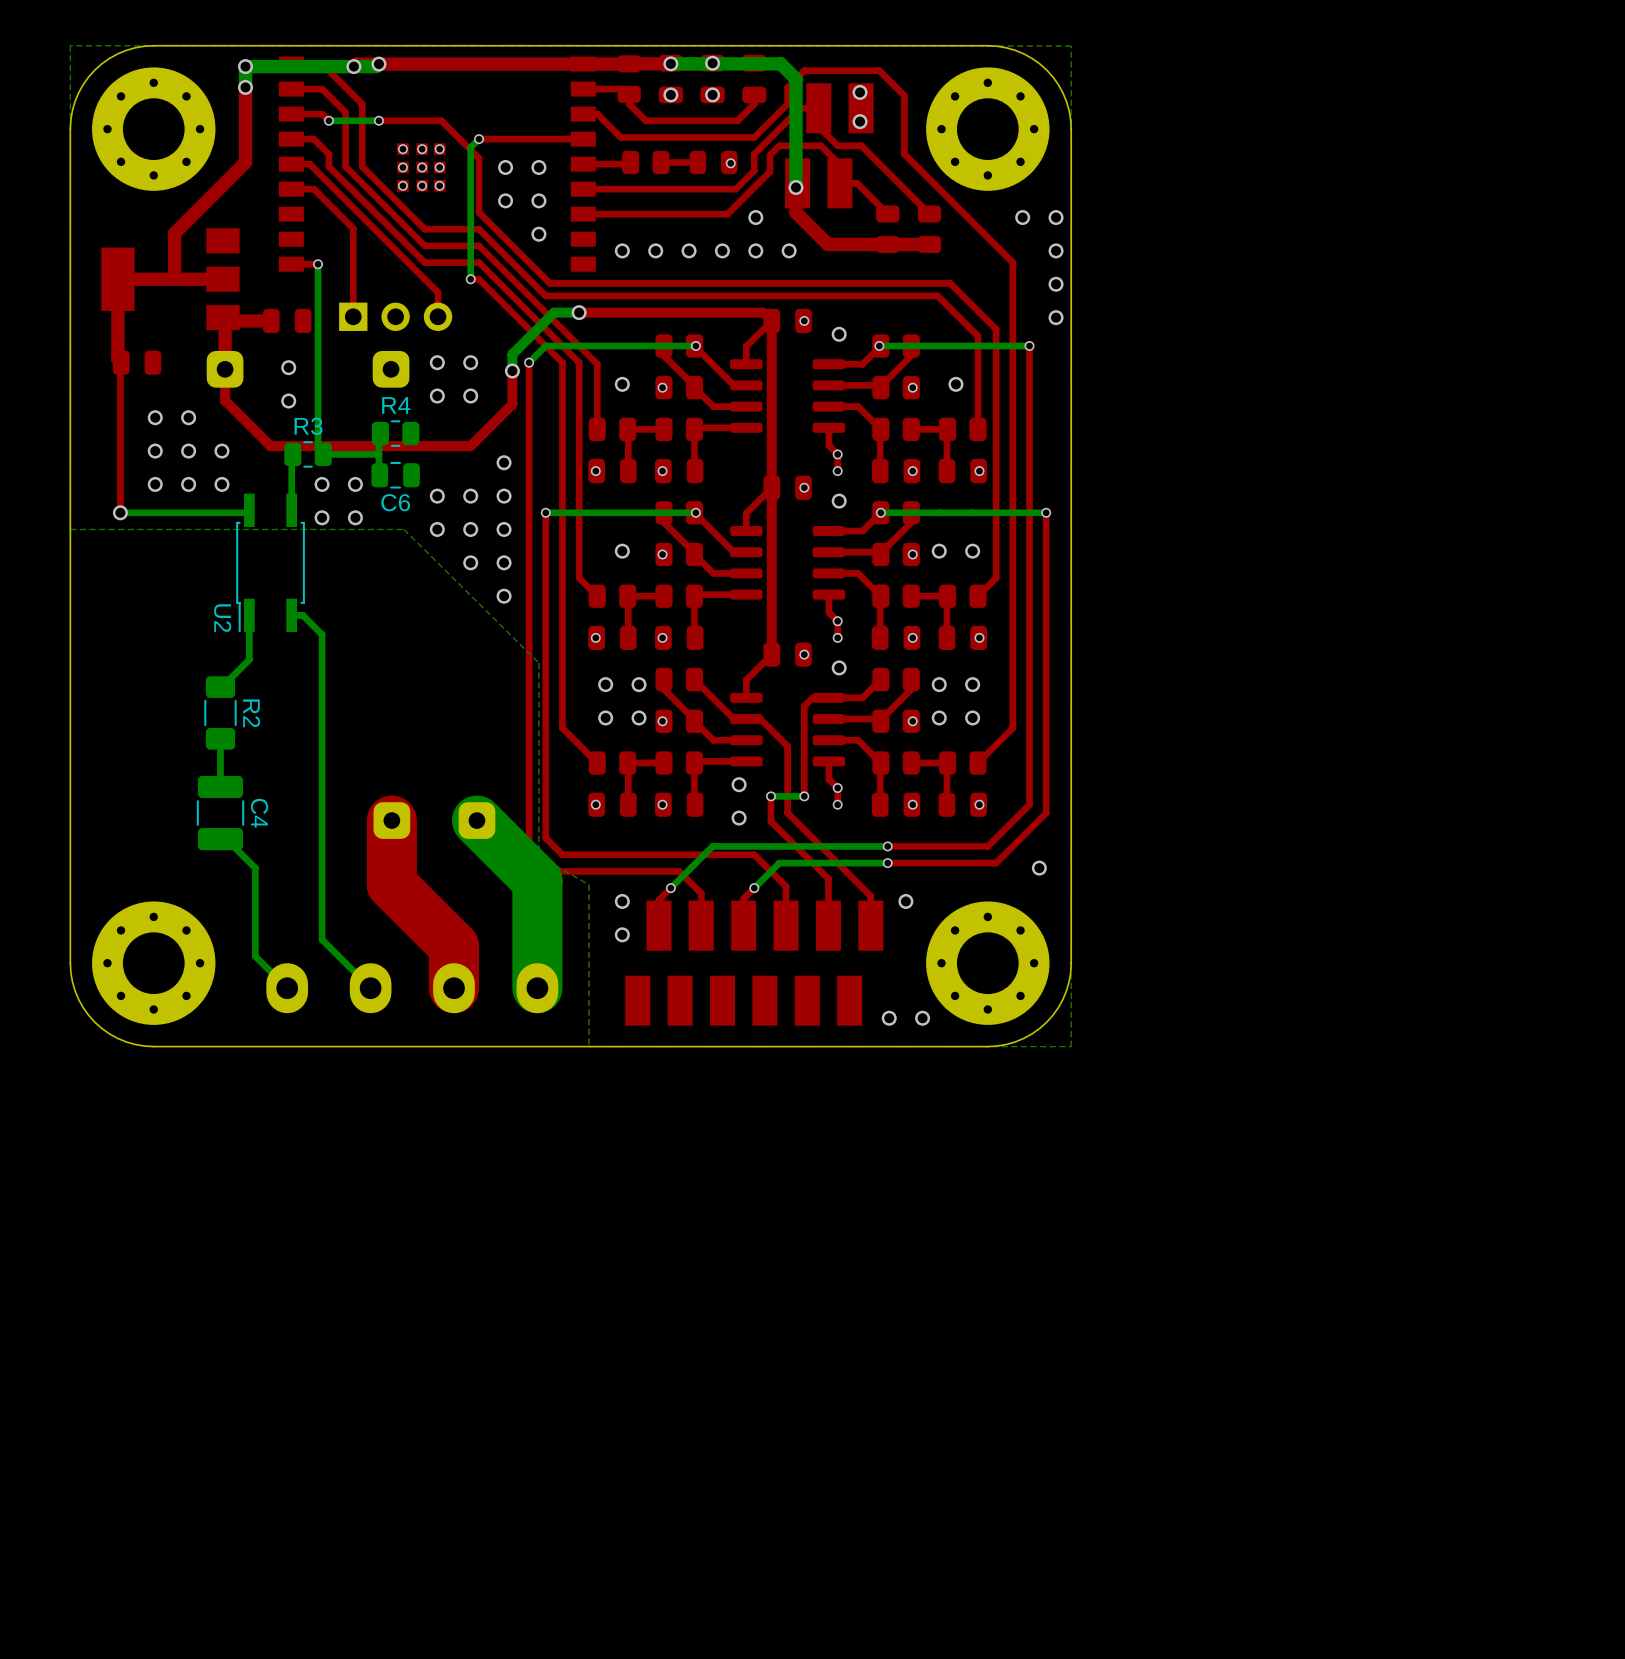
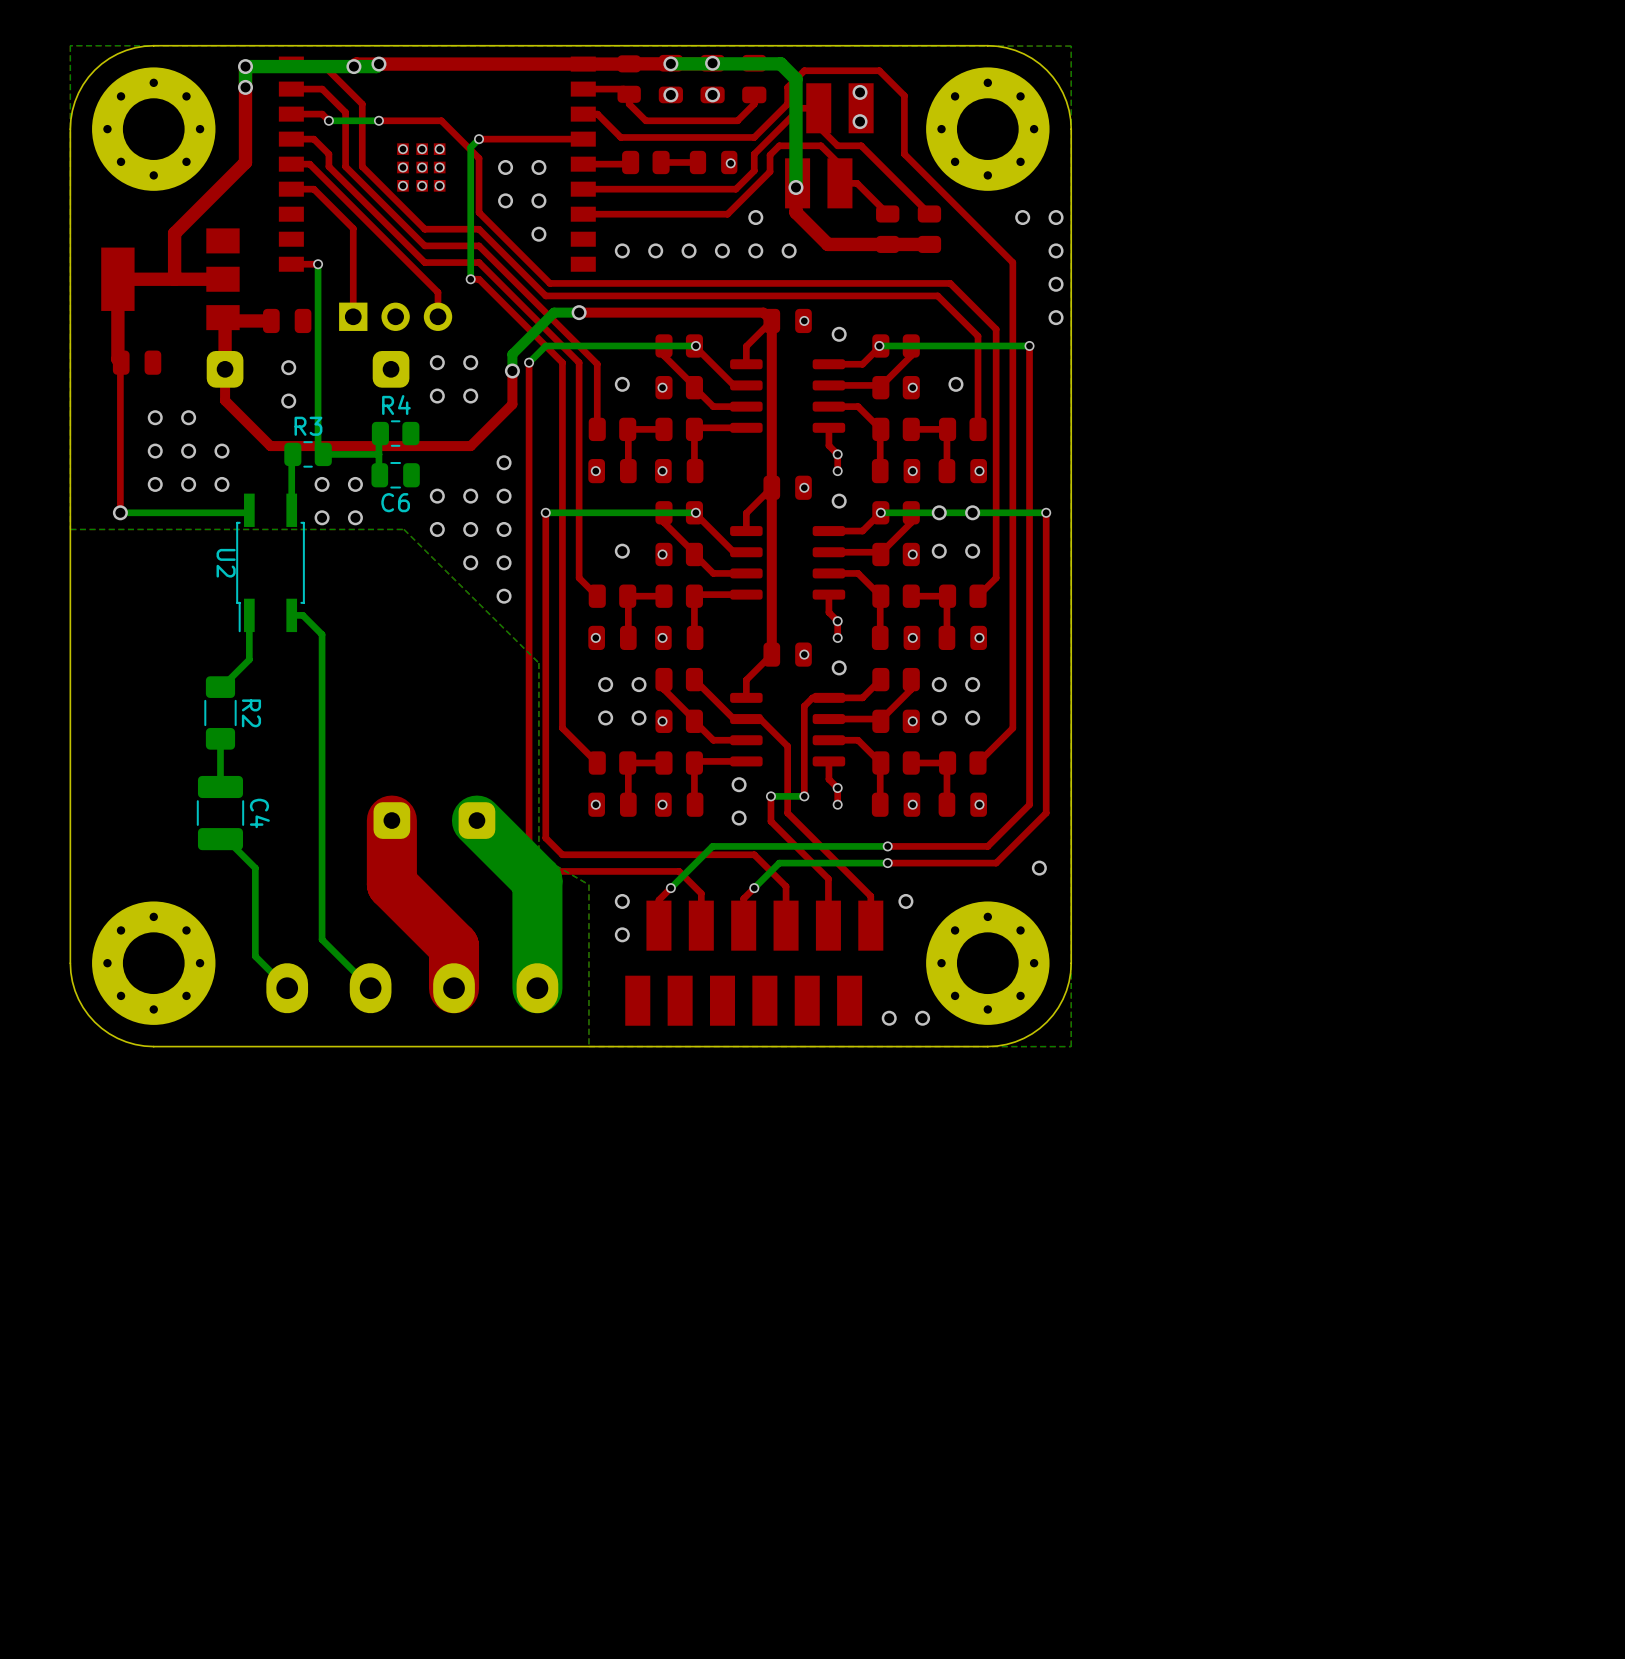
via: none -> (939, 512)
via: none -> (972, 512)
U2 name position: U2 (222, 618) -> U2 (226, 563)

